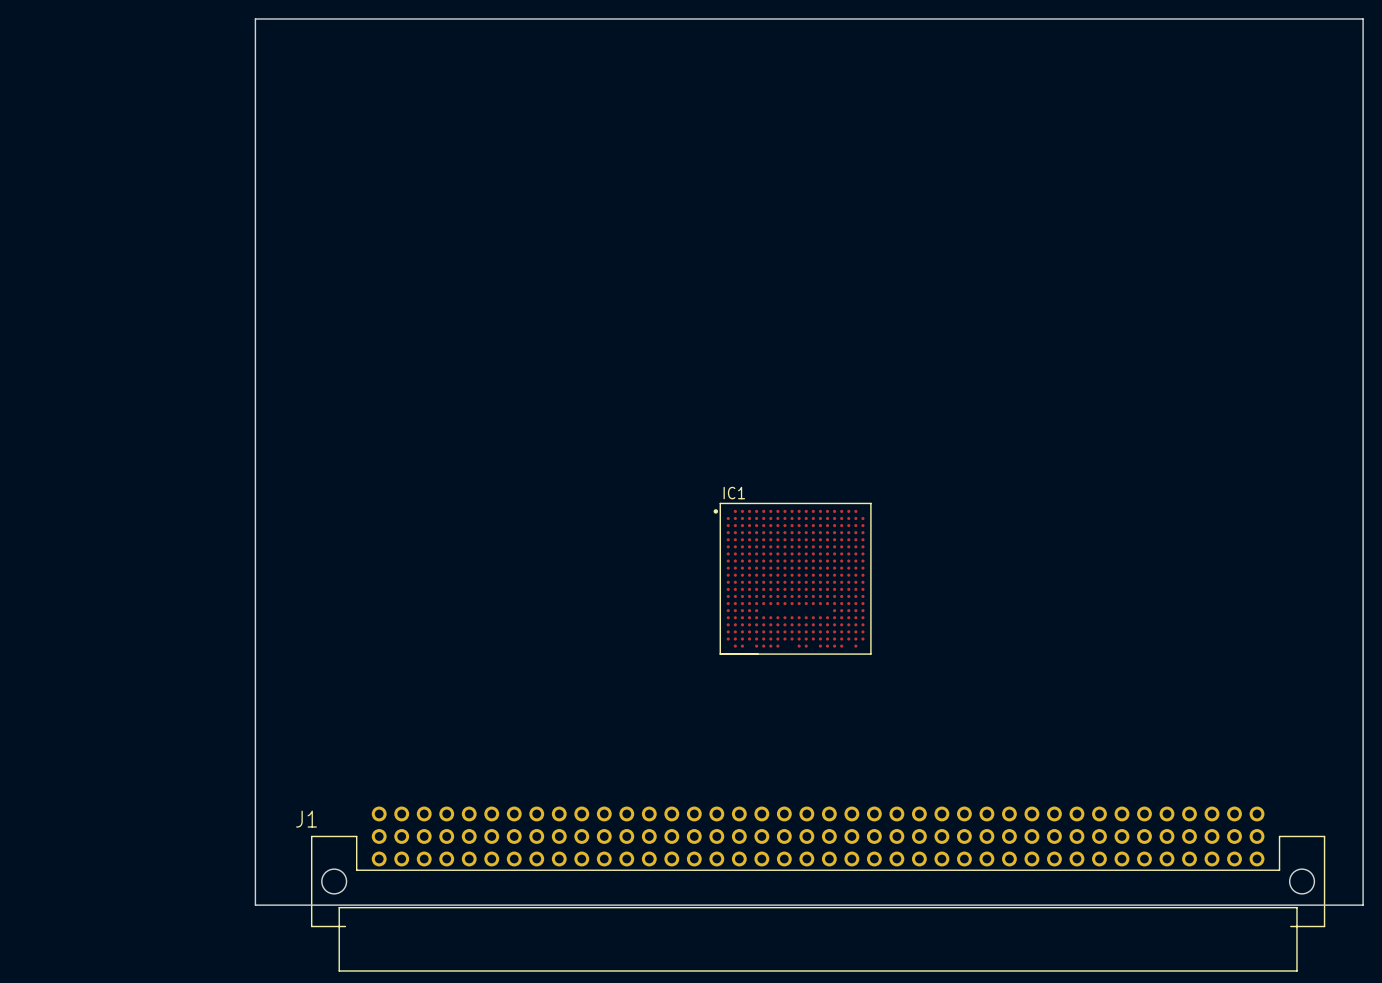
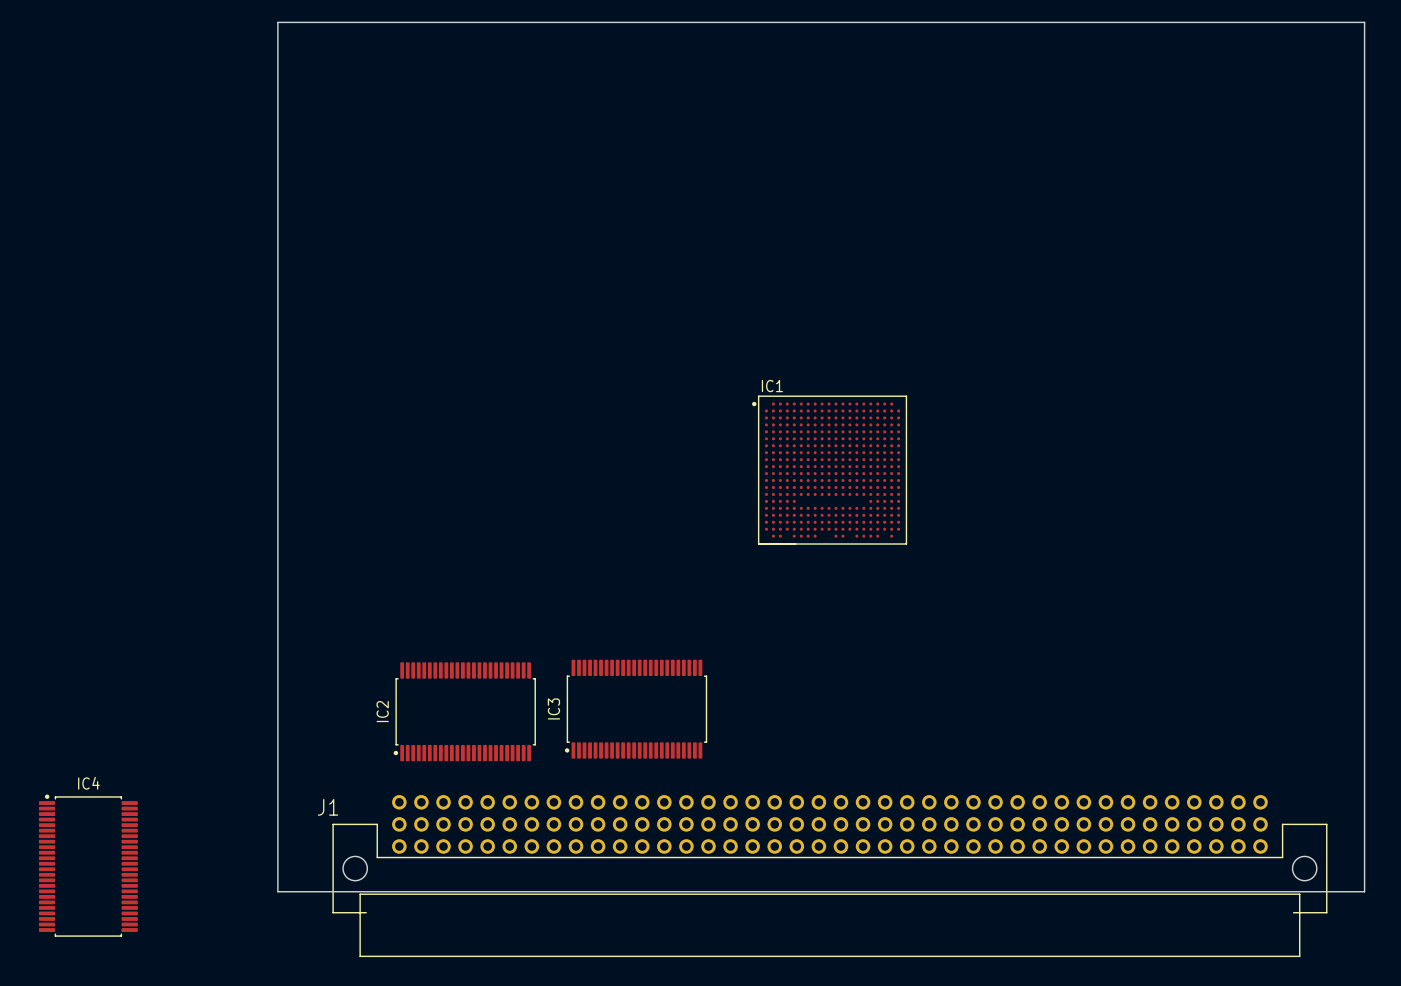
IC1 position: (792, 578) -> (829, 470)
IC3: none -> (635, 709)
IC2: none -> (464, 711)
IC4: none -> (88, 865)

